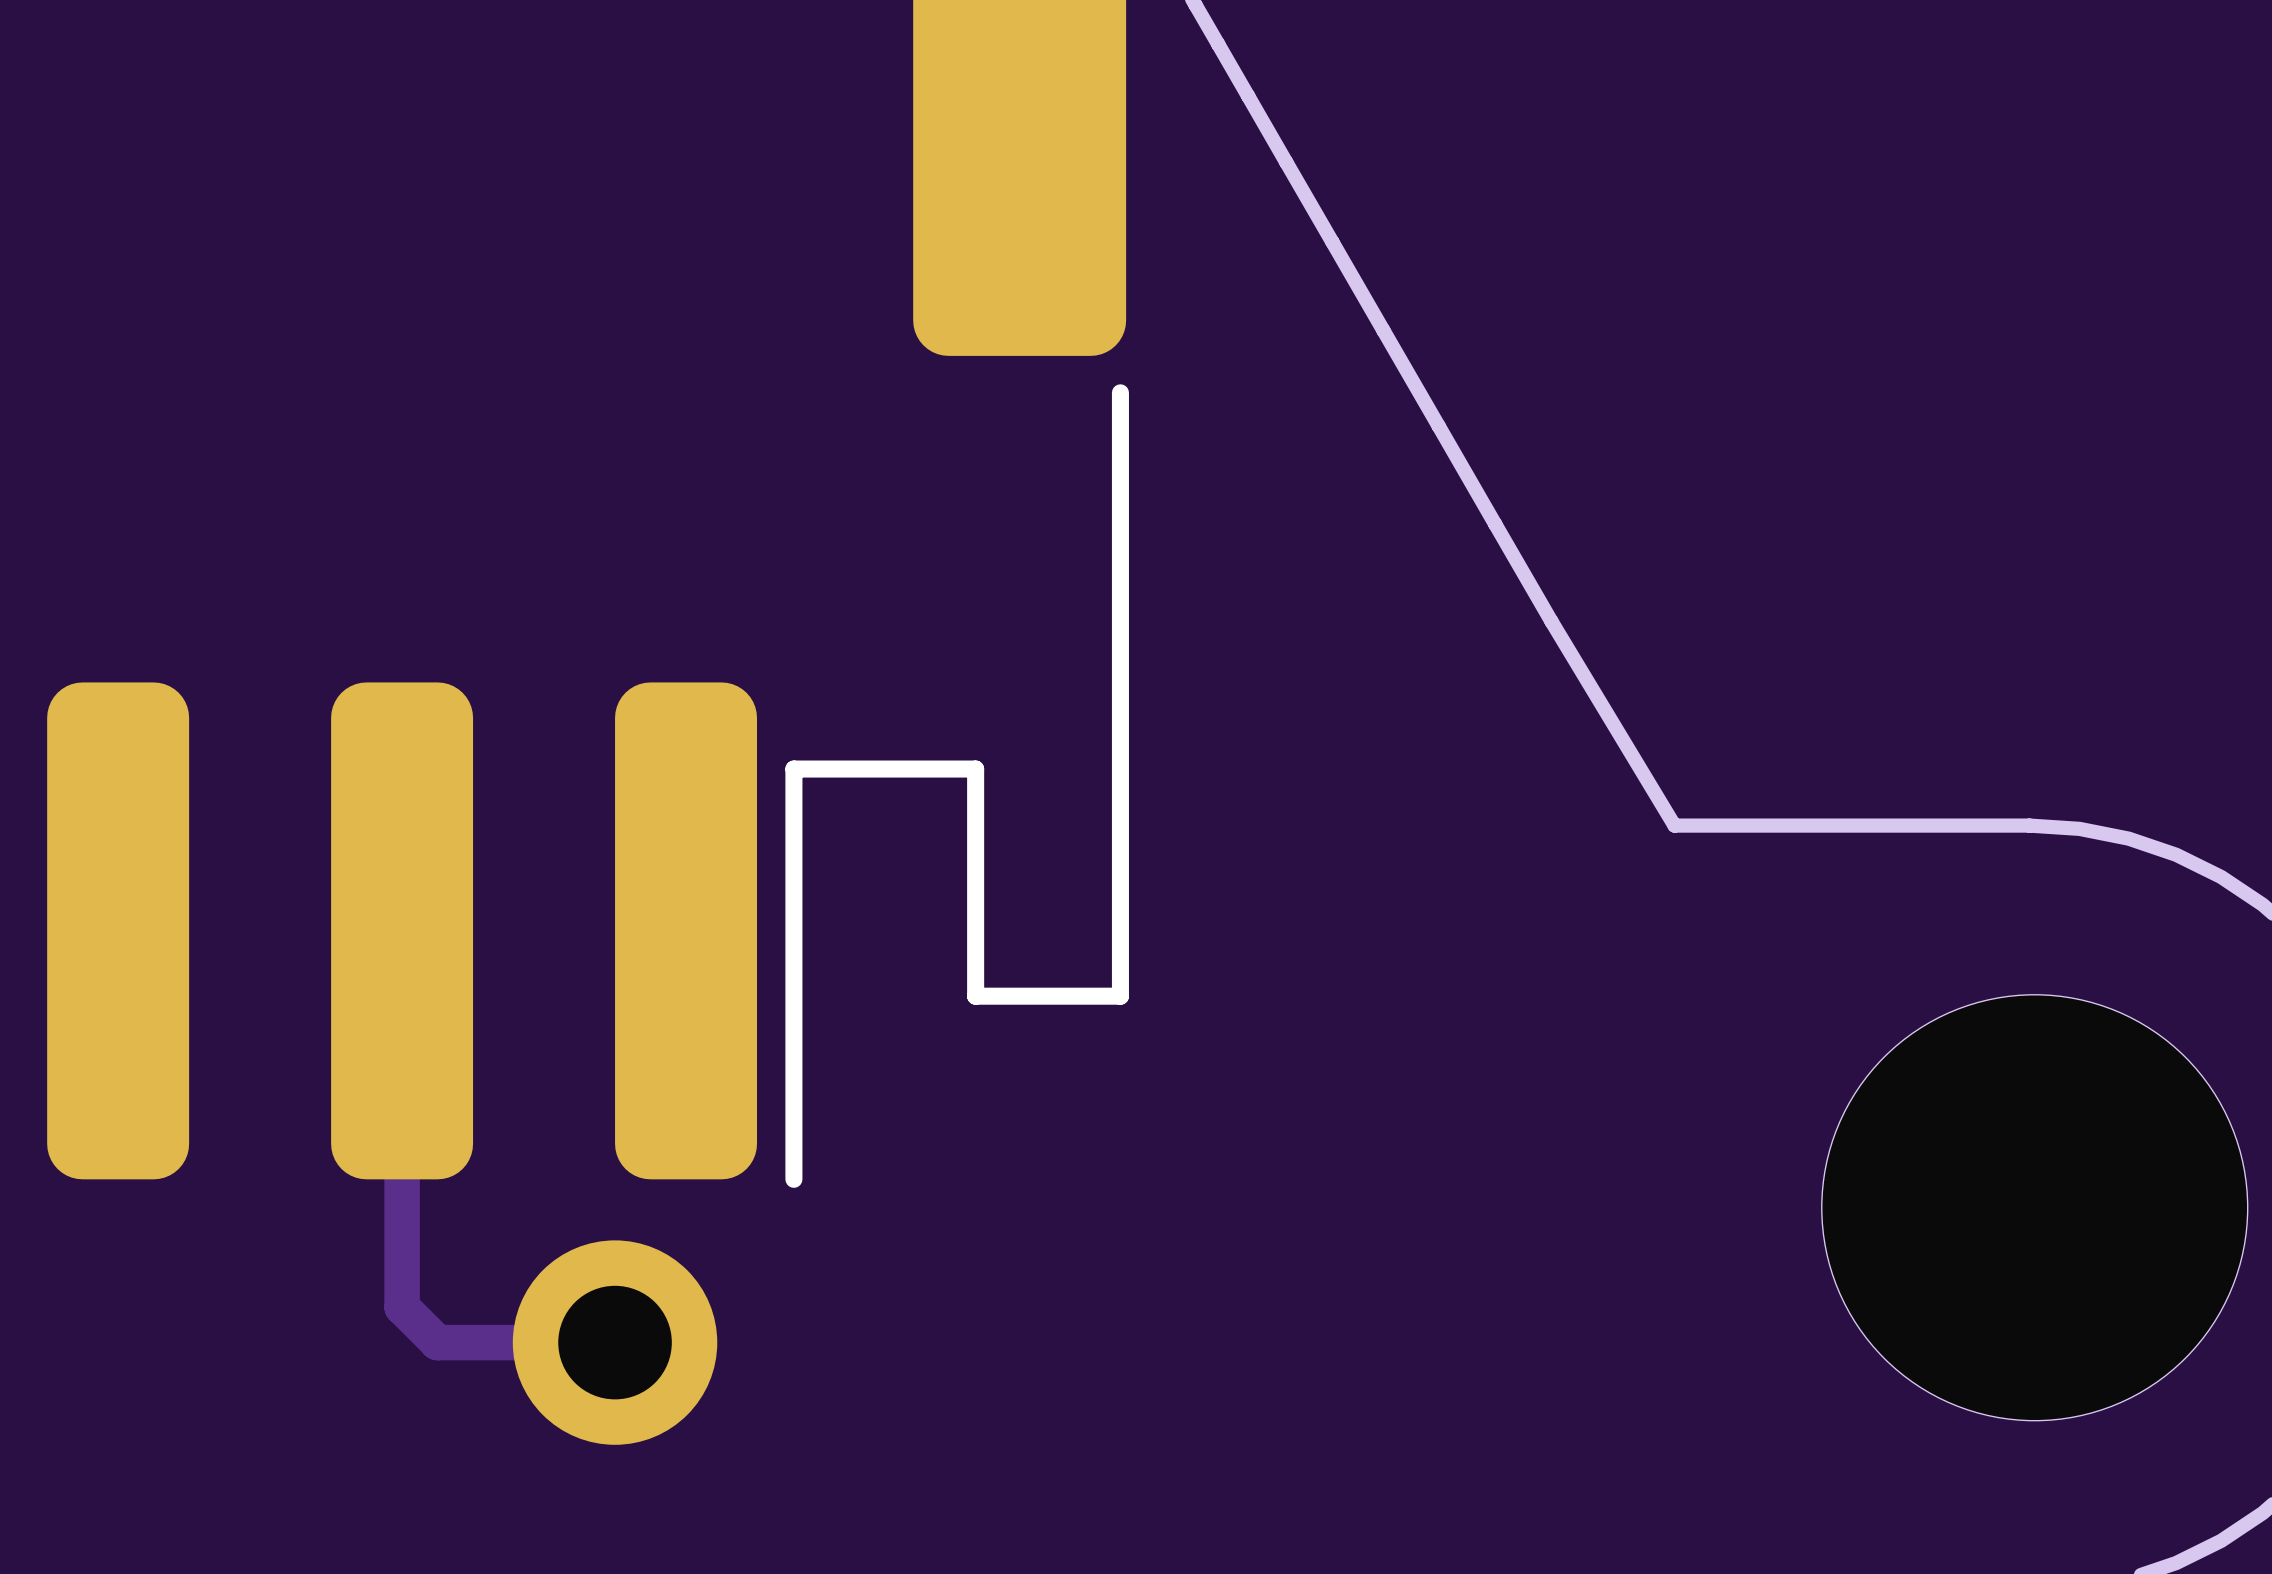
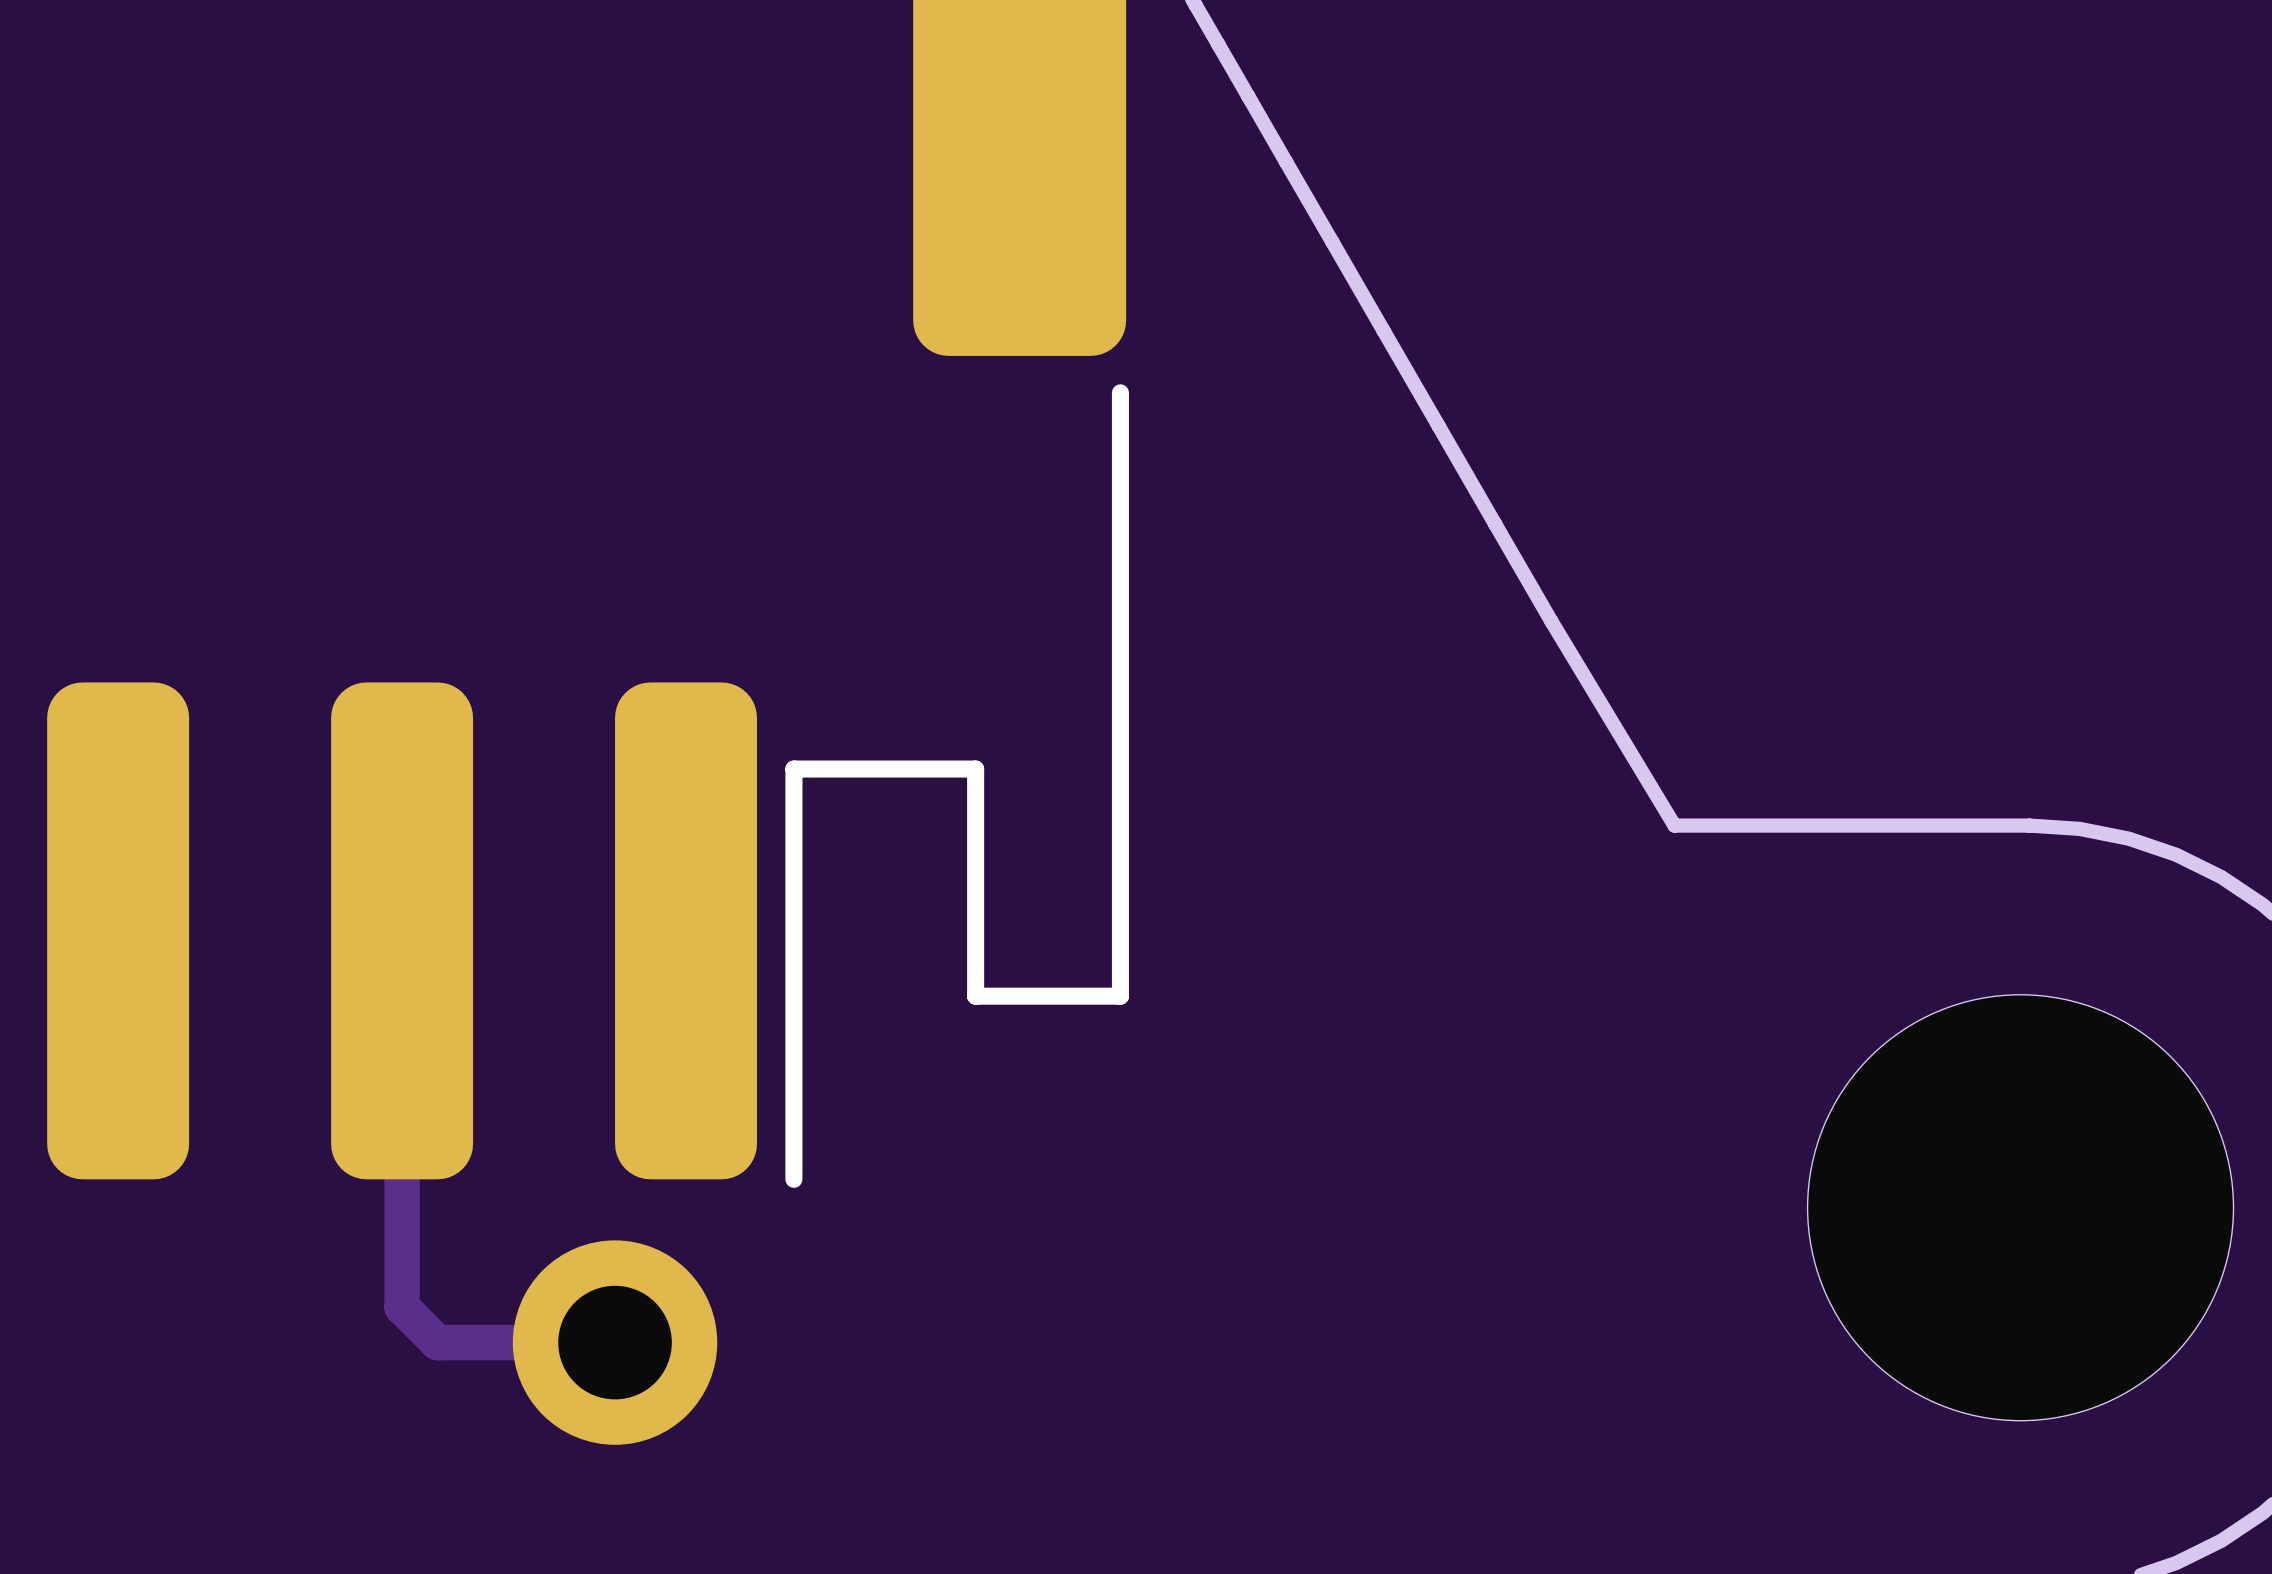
part position: (2034, 1207) -> (2020, 1207)

